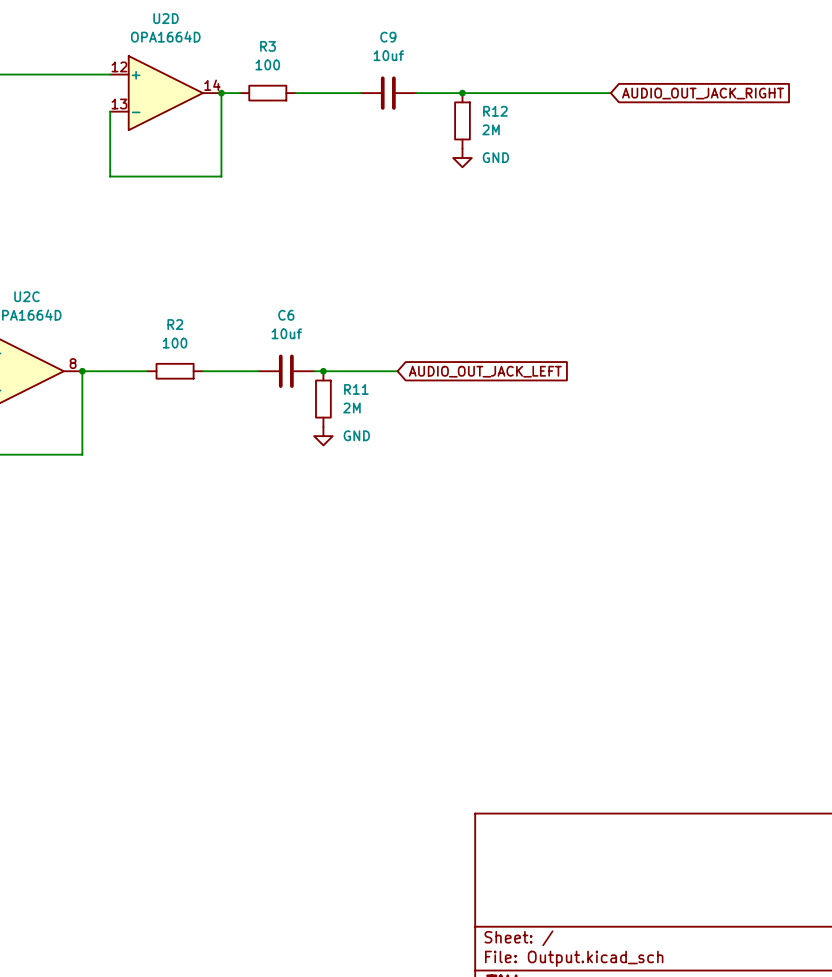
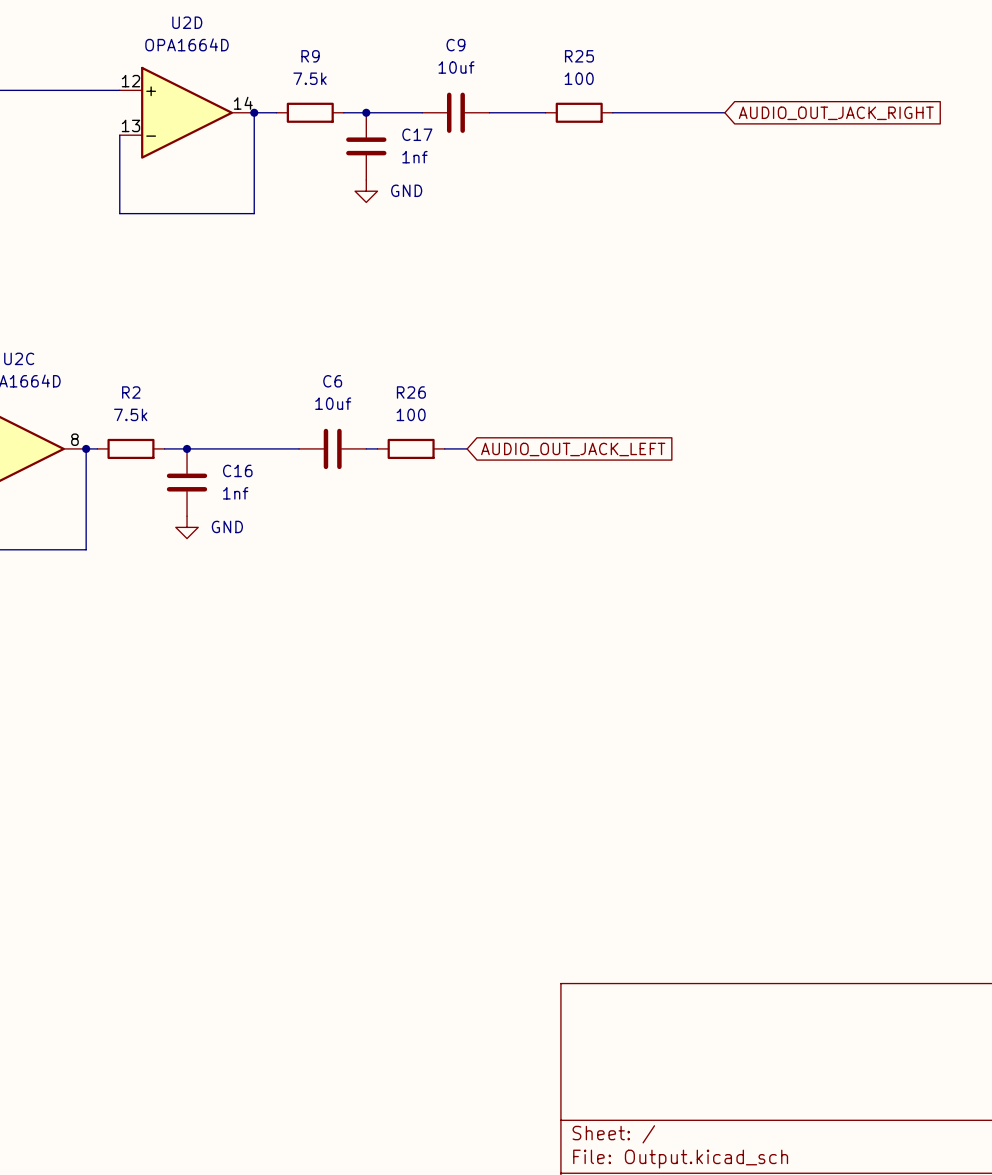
R3 name: R3 (268, 46) -> R9 (310, 56)
R3 value: 100 (267, 64) -> 7.5k (310, 78)
junction: none -> (366, 112)
wire: (462, 93) (518, 93) -> none
junction: (462, 93) -> none
R25: none -> 100 (579, 112)
C17: none -> 1nf (366, 146)
R12: 2M (462, 120) -> none
power symbol: none -> GND (366, 191)
power symbol: GND (462, 158) -> none
R2 value: 100 (175, 343) -> 7.5k (130, 414)
wire: (91, 371) (147, 371) -> (231, 448) (164, 448)
junction: none -> (187, 448)
R2 position: (175, 371) -> (130, 448)
wire: (323, 371) (379, 371) -> none
junction: (323, 371) -> none
R26: none -> 100 (411, 448)
C16: none -> 1nf (187, 482)
R11: 2M (323, 399) -> none
power symbol: none -> GND (187, 527)
power symbol: GND (323, 436) -> none

